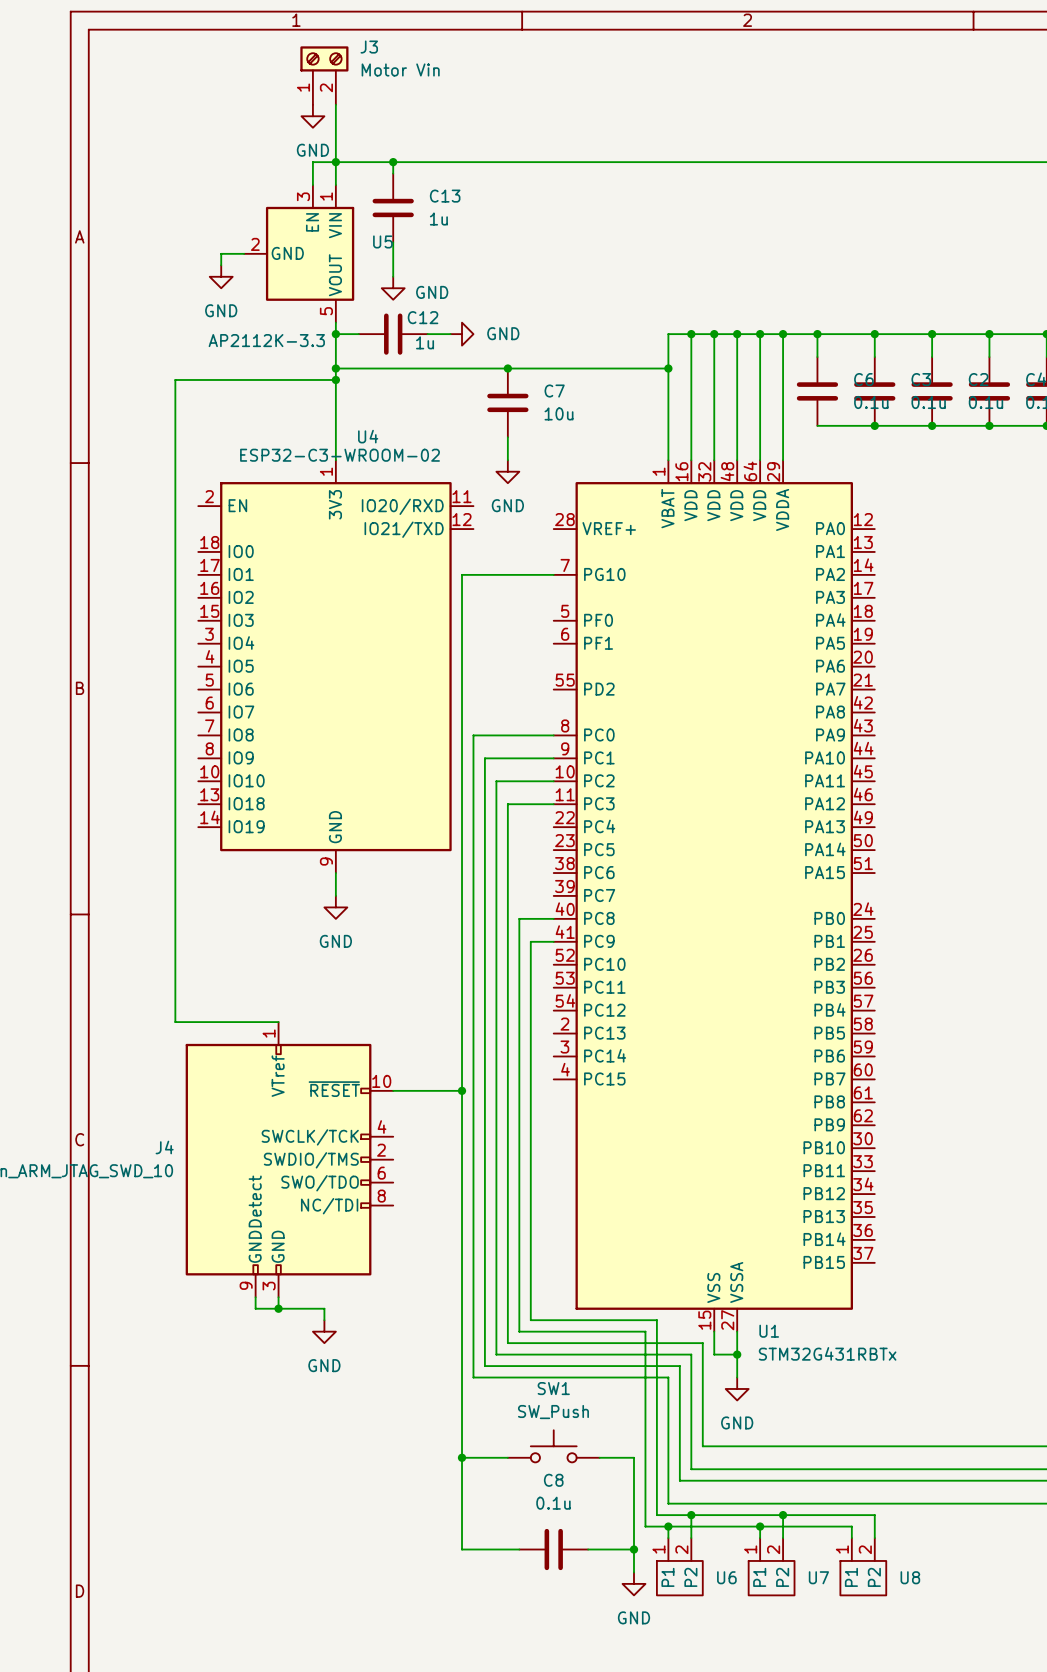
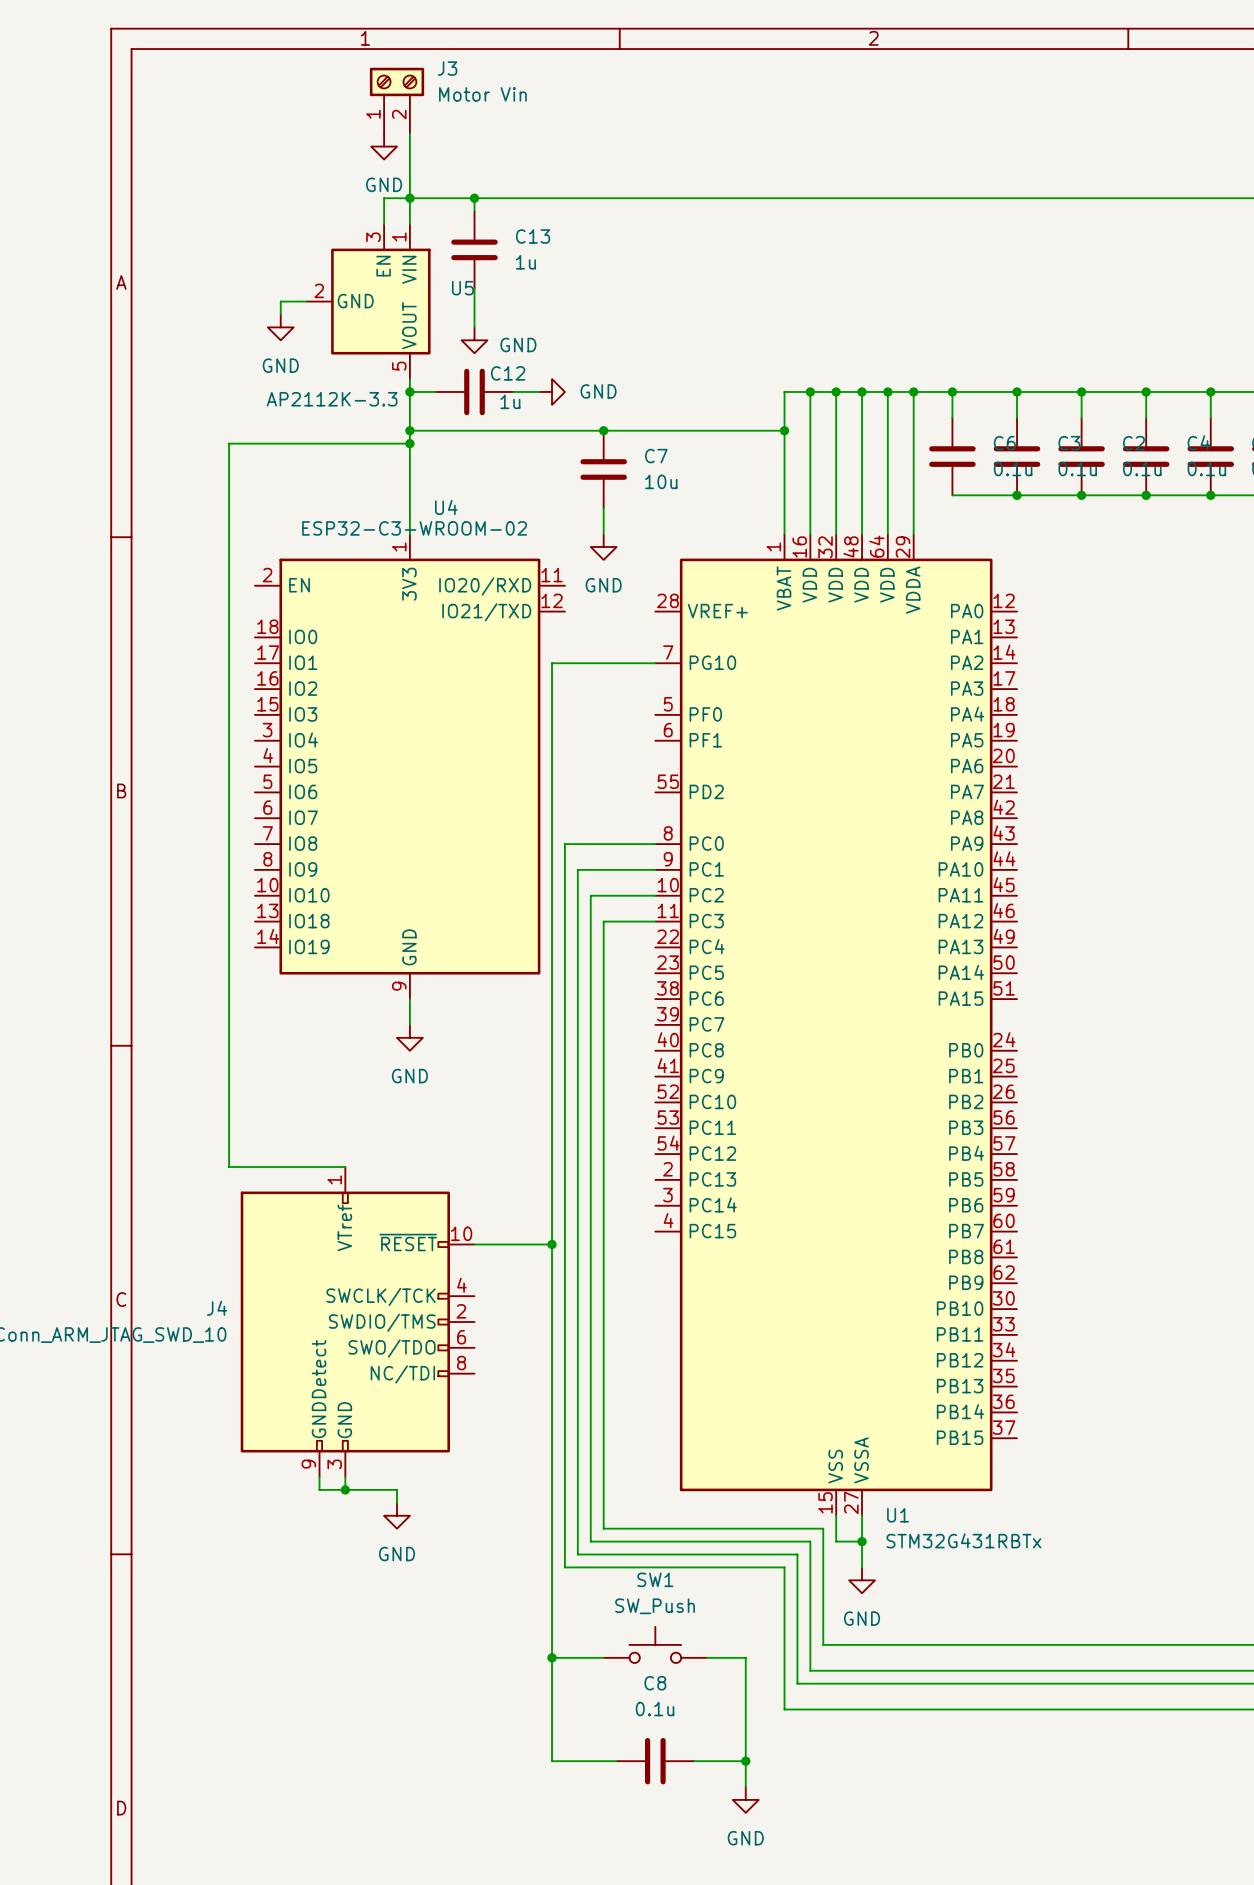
wire: (553, 918) (519, 918) (519, 1331) (645, 1331) (645, 1526) (851, 1526) (851, 1538) -> none
wire: (553, 941) (530, 941) (530, 1320) (656, 1320) (656, 1515) (874, 1515) (874, 1538) -> none
wire: (691, 1515) (691, 1538) -> none
junction: (691, 1515) -> none
wire: (783, 1515) (783, 1538) -> none
junction: (783, 1515) -> none
wire: (668, 1526) (668, 1538) -> none
junction: (668, 1526) -> none
wire: (760, 1526) (760, 1538) -> none
junction: (760, 1526) -> none
U6: (679, 1566) -> none
U7: (771, 1566) -> none
U8: (863, 1566) -> none

